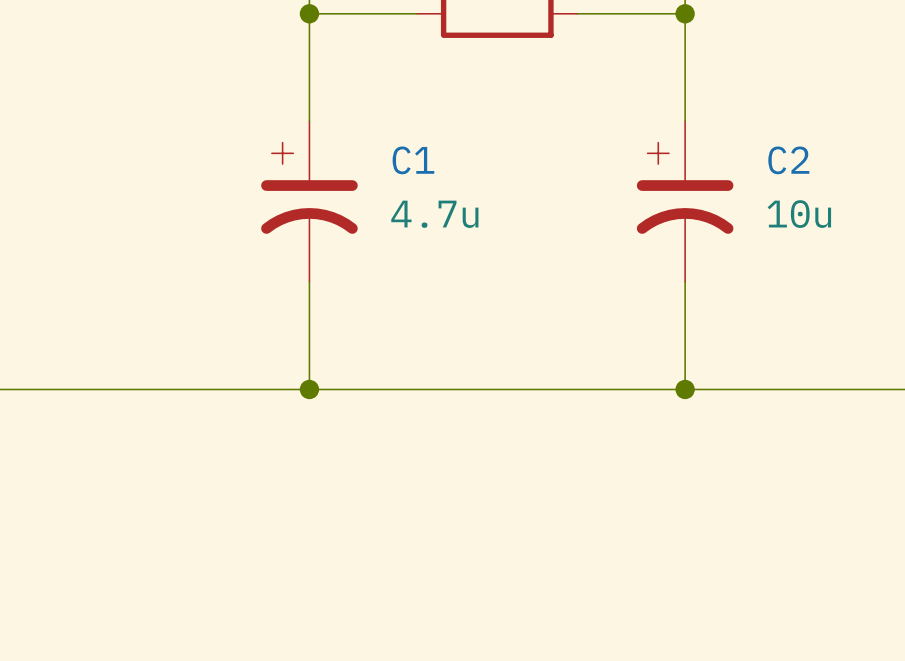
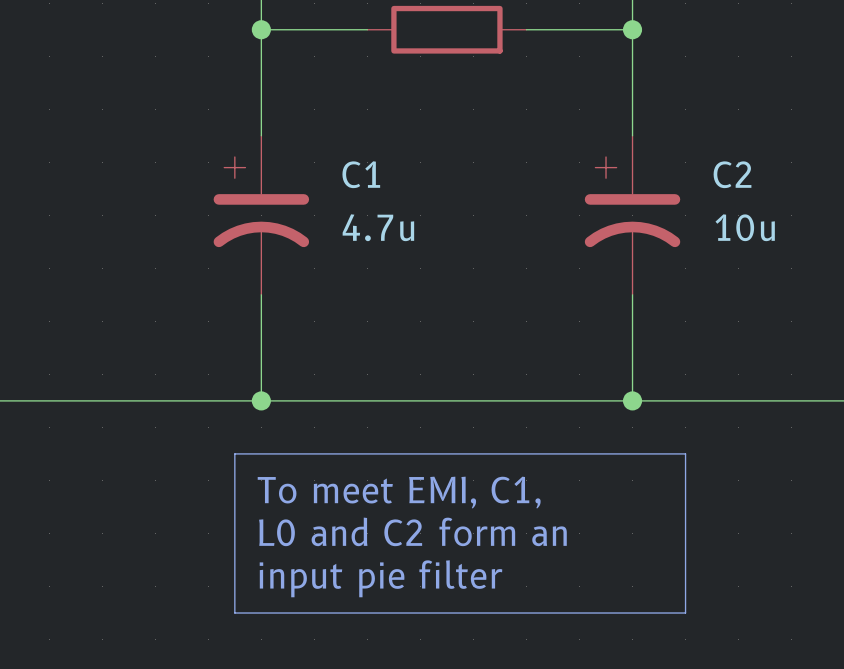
line: none -> (234, 453) (685, 453) (685, 613) (234, 613) (234, 453)
text: none -> To meet EMI, C1, (399, 492)
text: none -> L0 and C2 form an (412, 531)
text: none -> input pie filter (380, 578)

